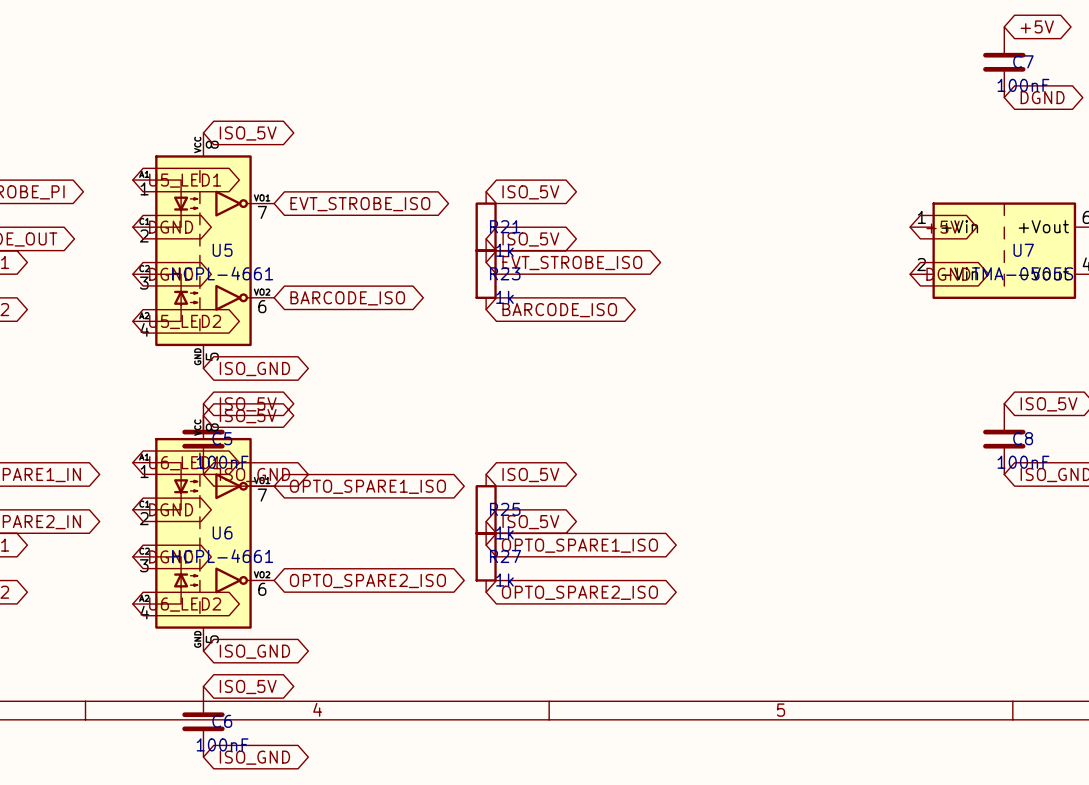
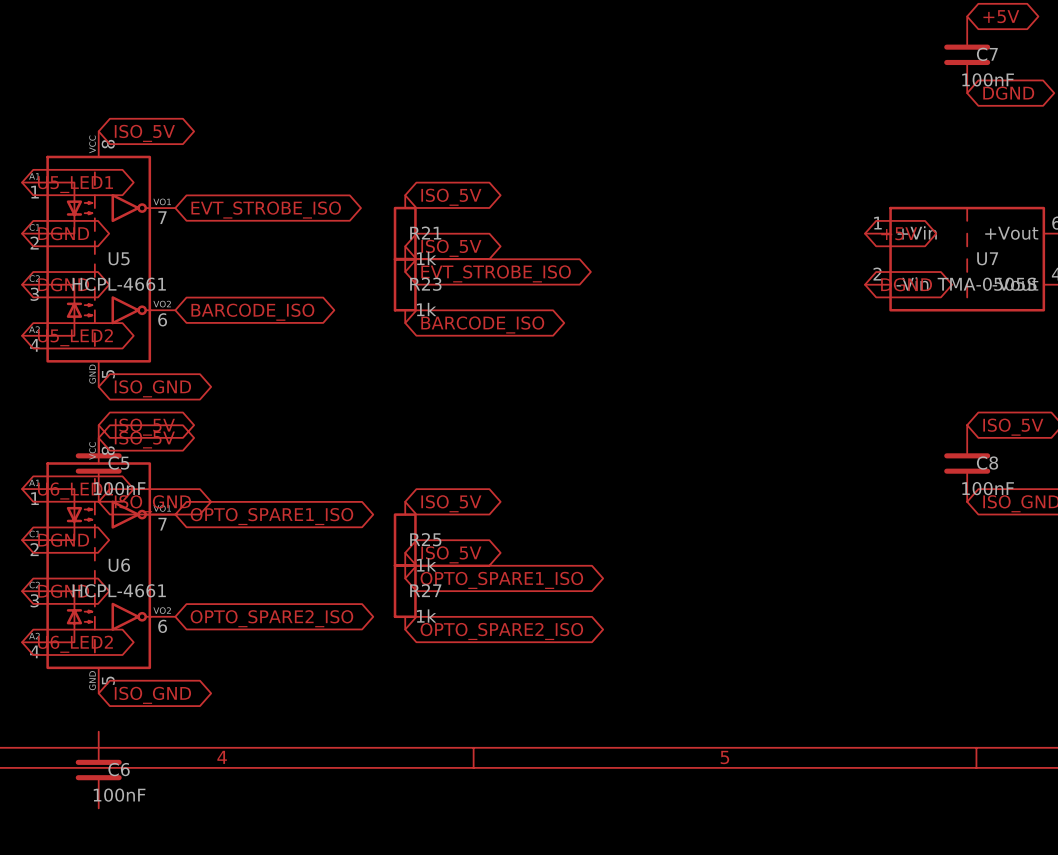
global label: ISO_5V (248, 687) -> none
global label: ISO_GND (254, 757) -> none

